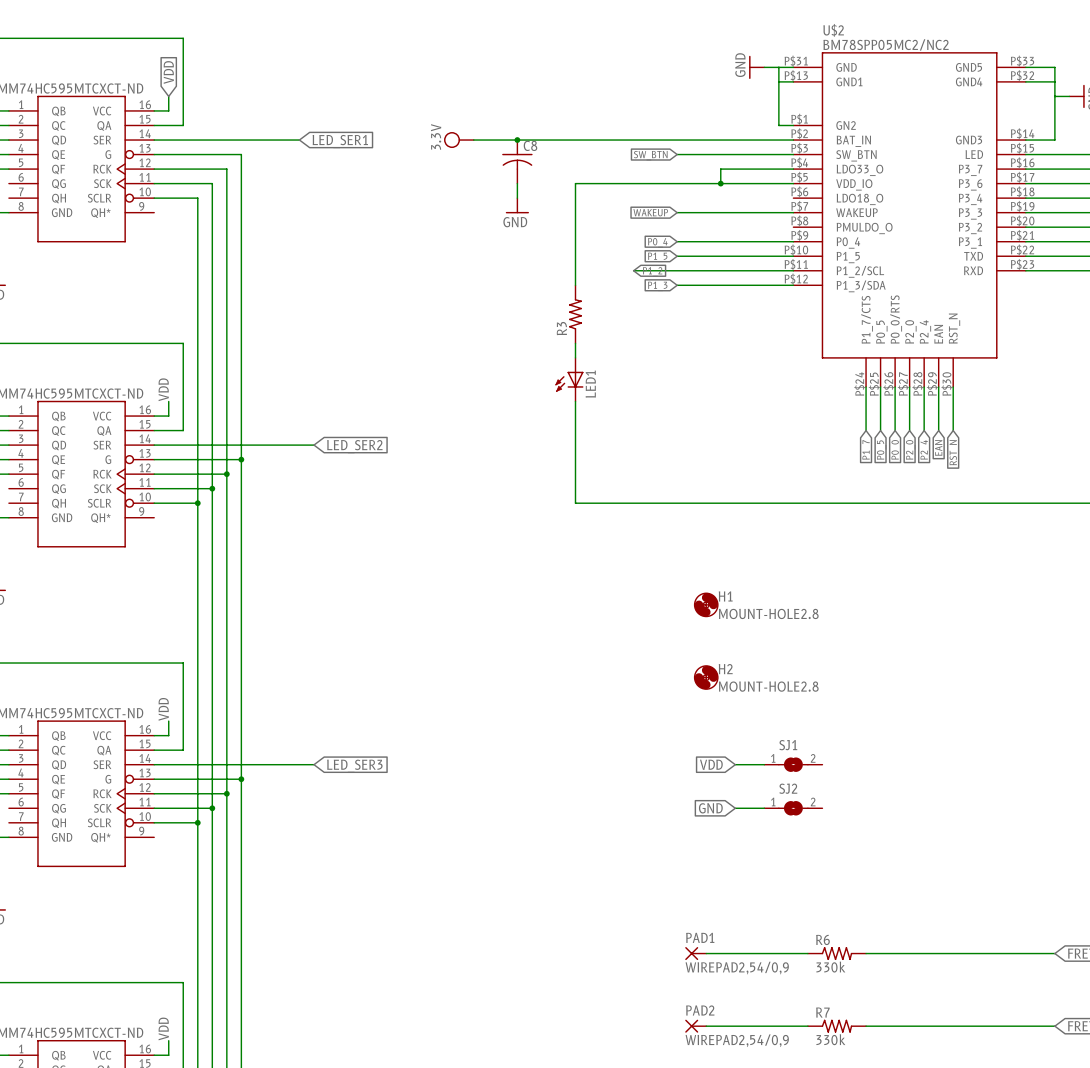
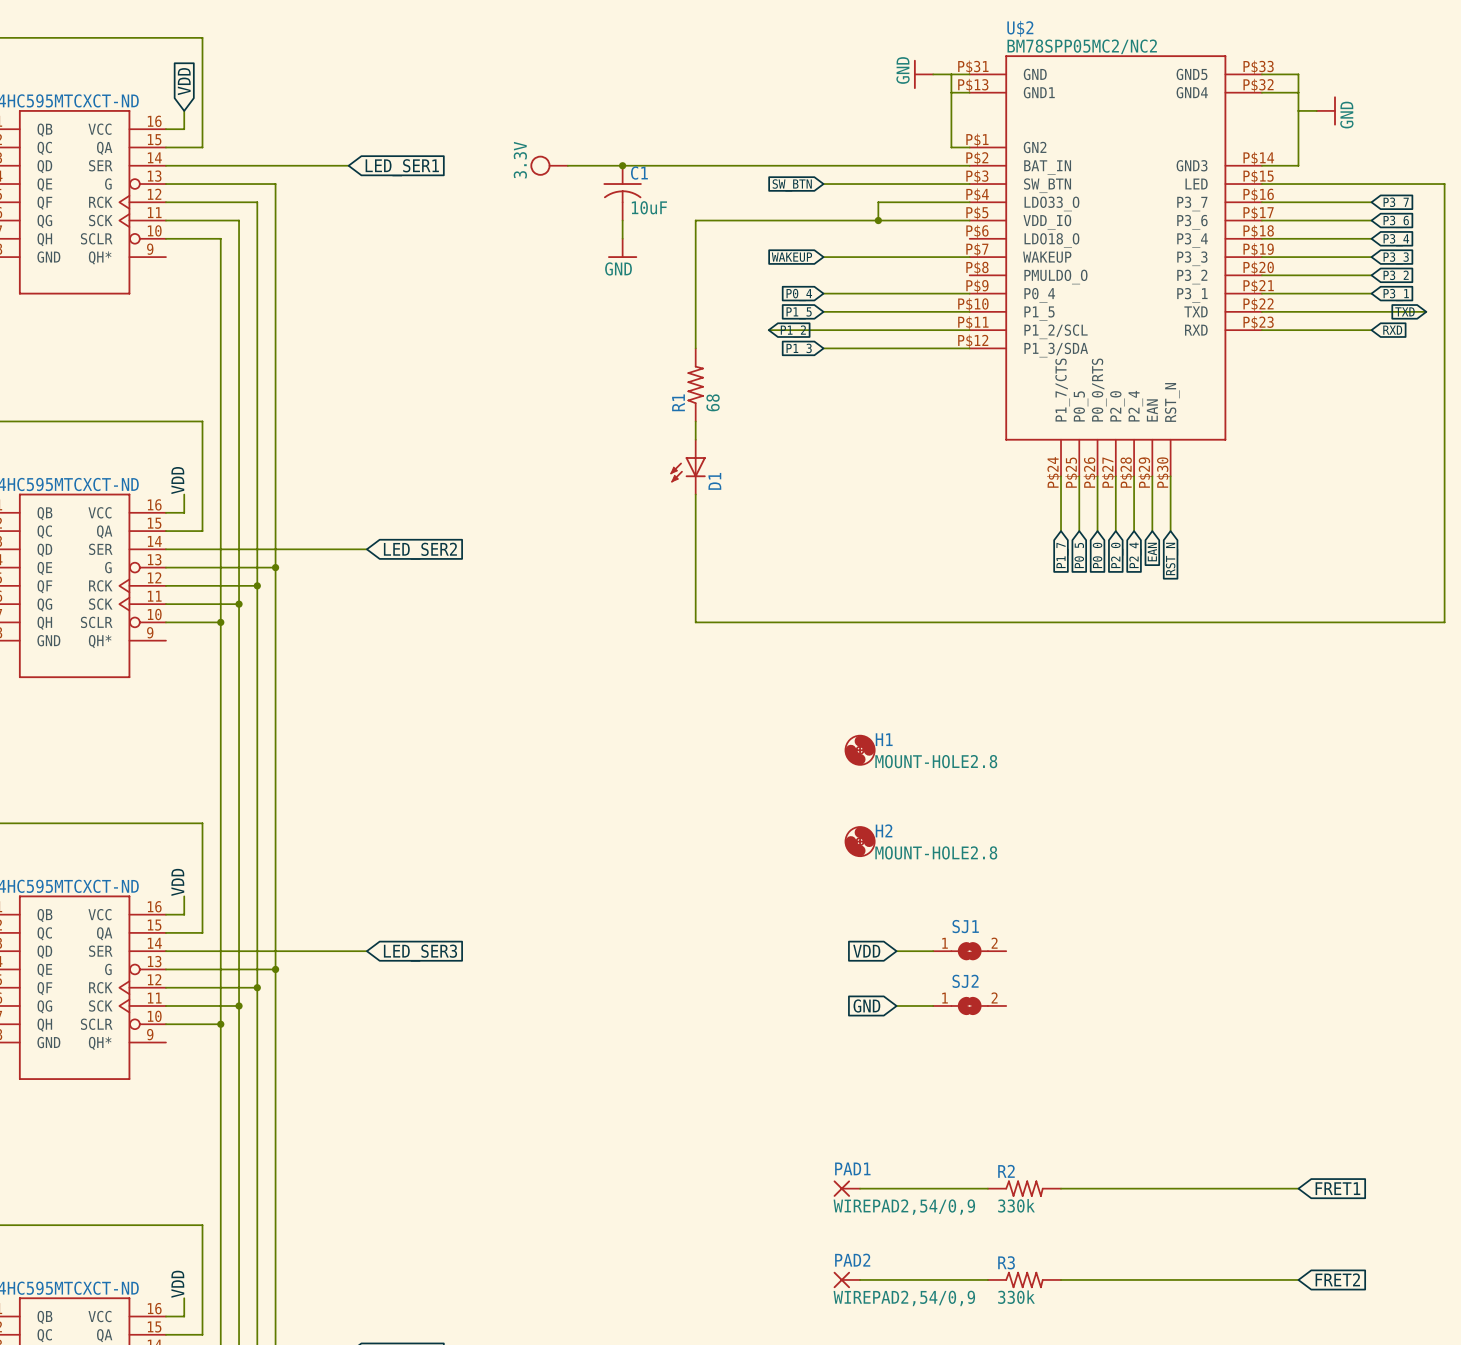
C8 name: C8 (530, 145) -> C1 (639, 173)
C8 value: none -> 10uF (649, 207)
R3 name: R3 (561, 328) -> R1 (678, 402)
R3 value: none -> 68 (713, 402)
LED1 name: LED1 (590, 384) -> D1 (714, 481)
R6 name: R6 (822, 939) -> R2 (1006, 1171)
R7 name: R7 (822, 1012) -> R3 (1006, 1262)

